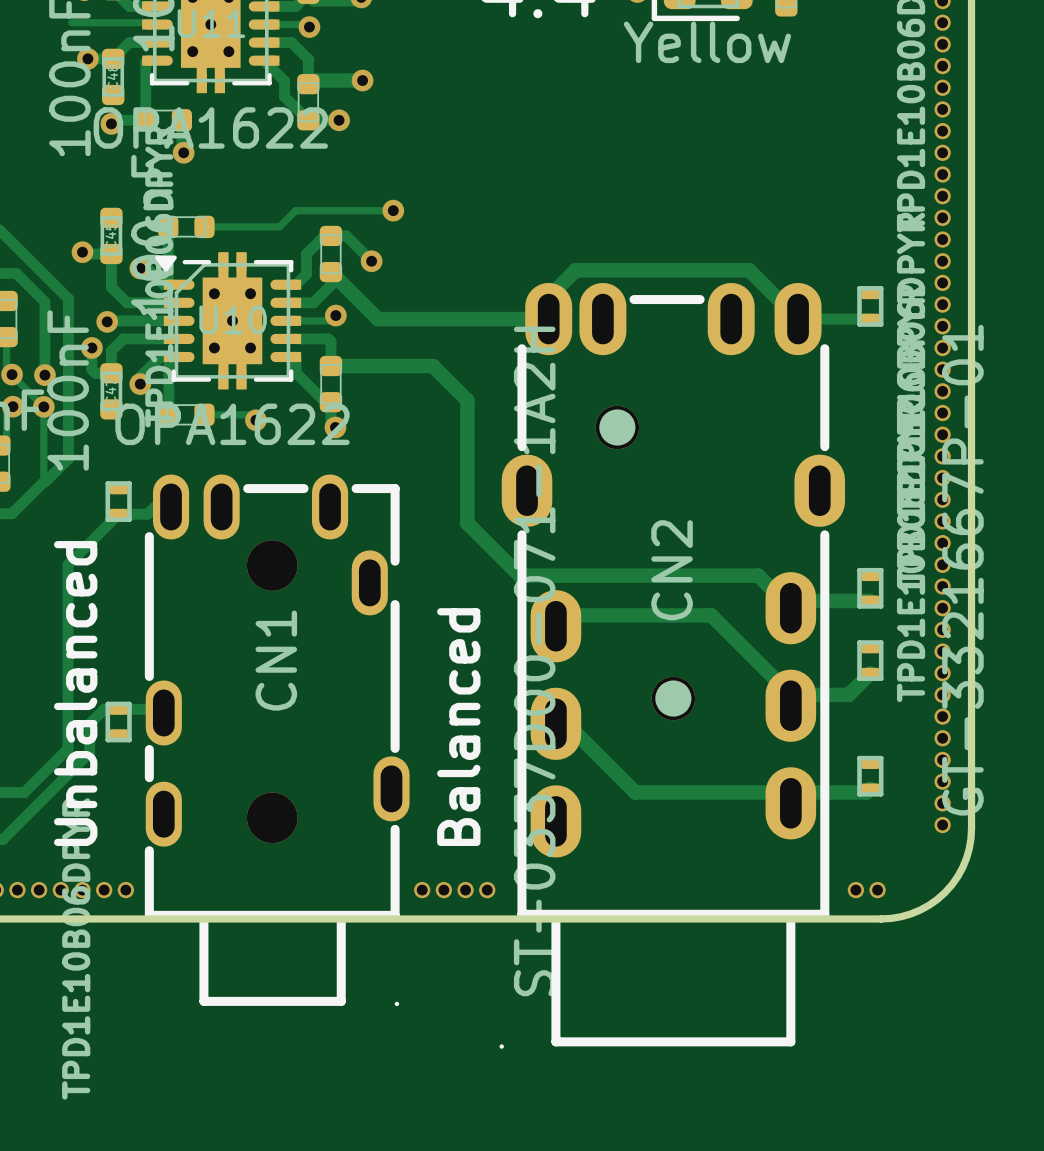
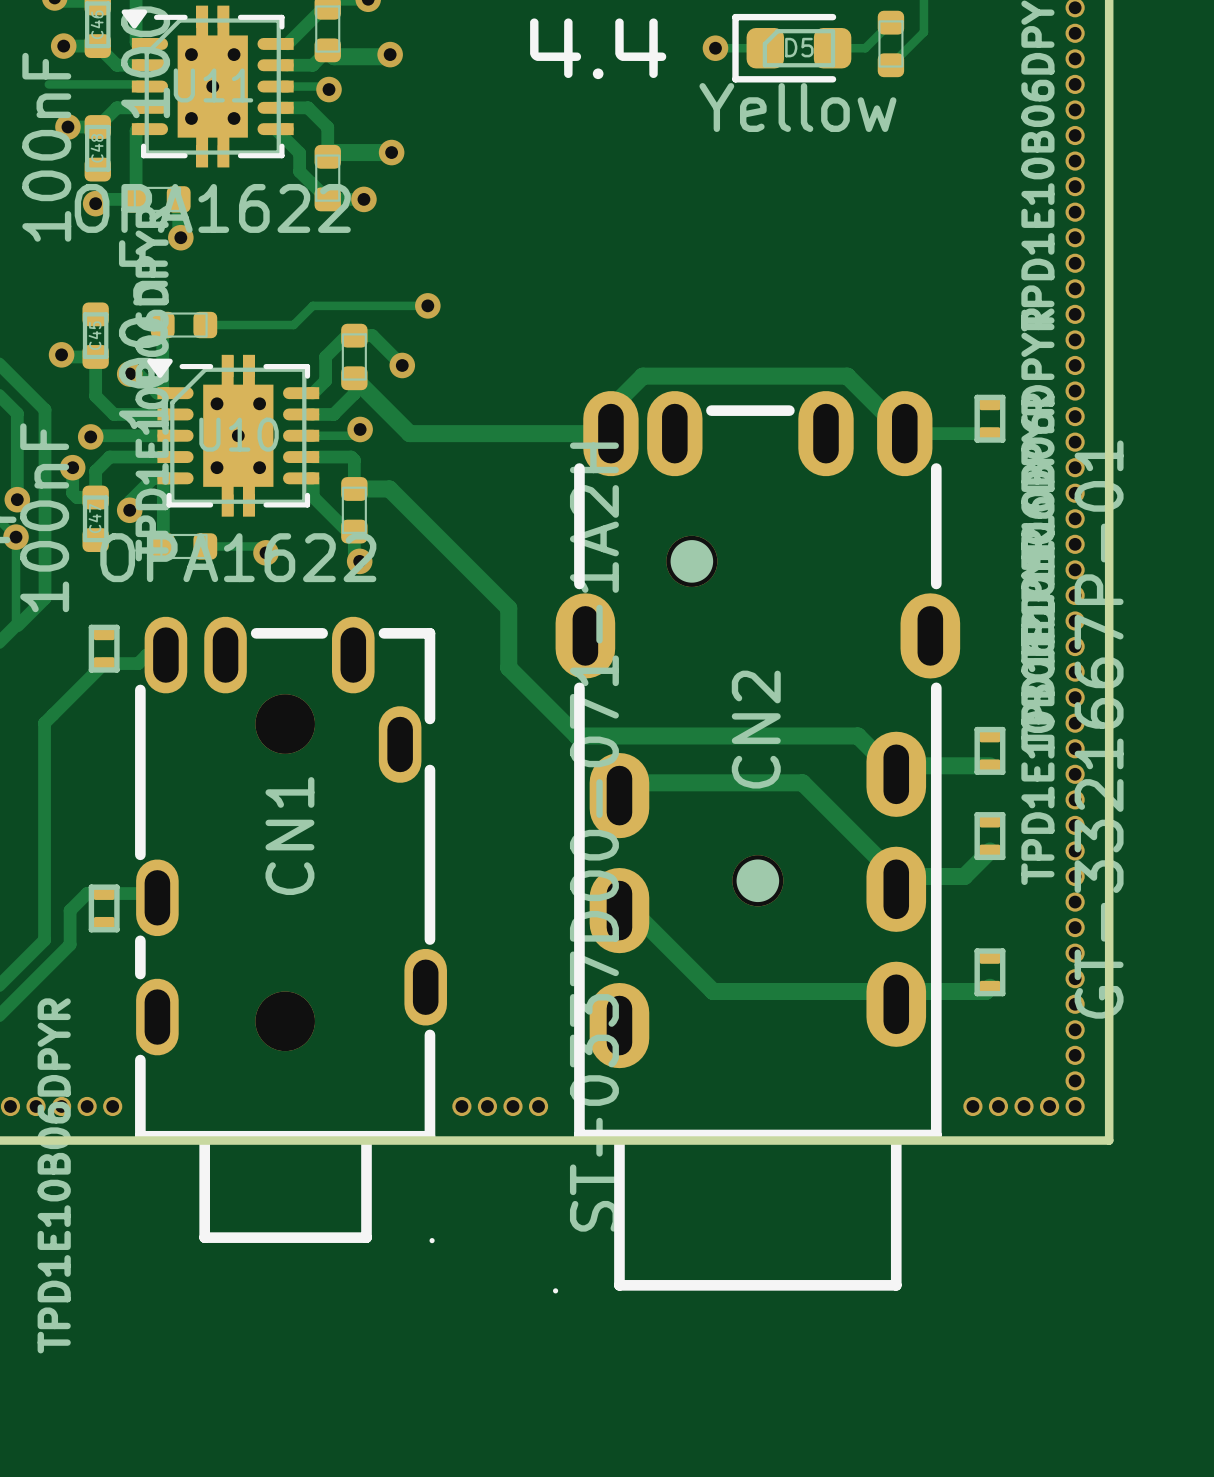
track: (360, 366) (433, 366) (467, 400) (467, 523) -> (389, 488) (508, 608) (508, 667) (515, 674)
text: Unbalanced (75, 693) -> none
text: Balanced (458, 727) -> none
board edge: (971, 828) (966, 858) (957, 876) (945, 892) (929, 905) (911, 913) (881, 918) -> (1109, 1034) (1109, 1140) (1002, 1140)
via: none -> (1075, 1055)
via: none -> (1075, 1080)
via: none -> (1024, 1106)
via: none -> (1049, 1106)
via: none -> (1075, 1106)

